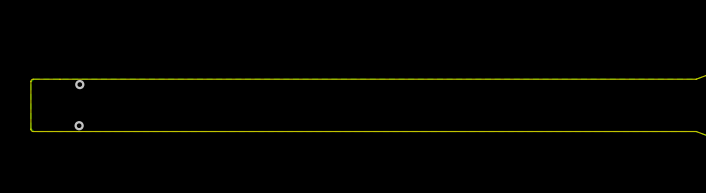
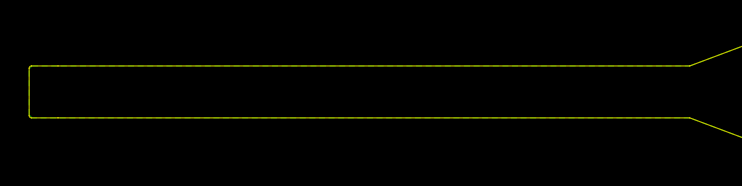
via: (79, 84) -> none
via: (79, 125) -> none

